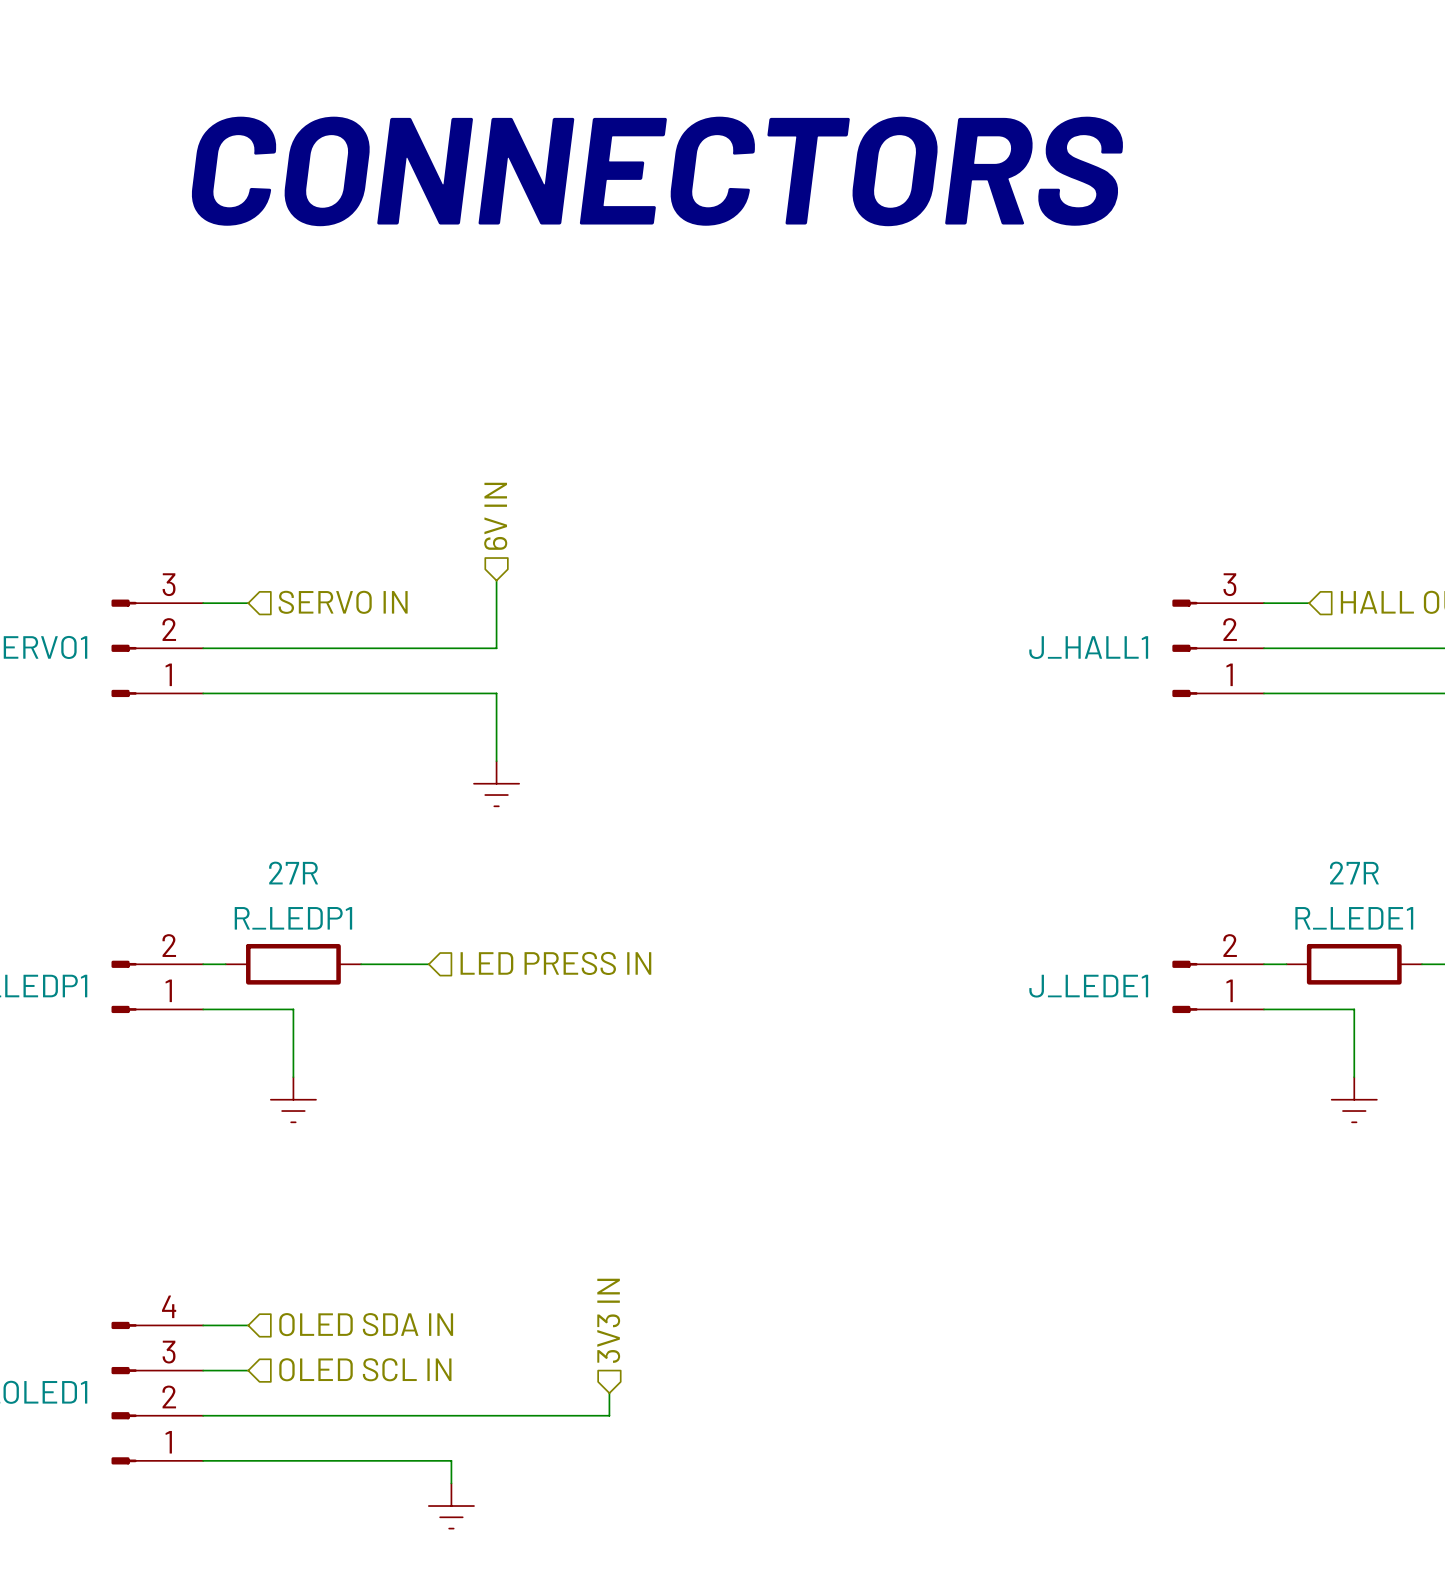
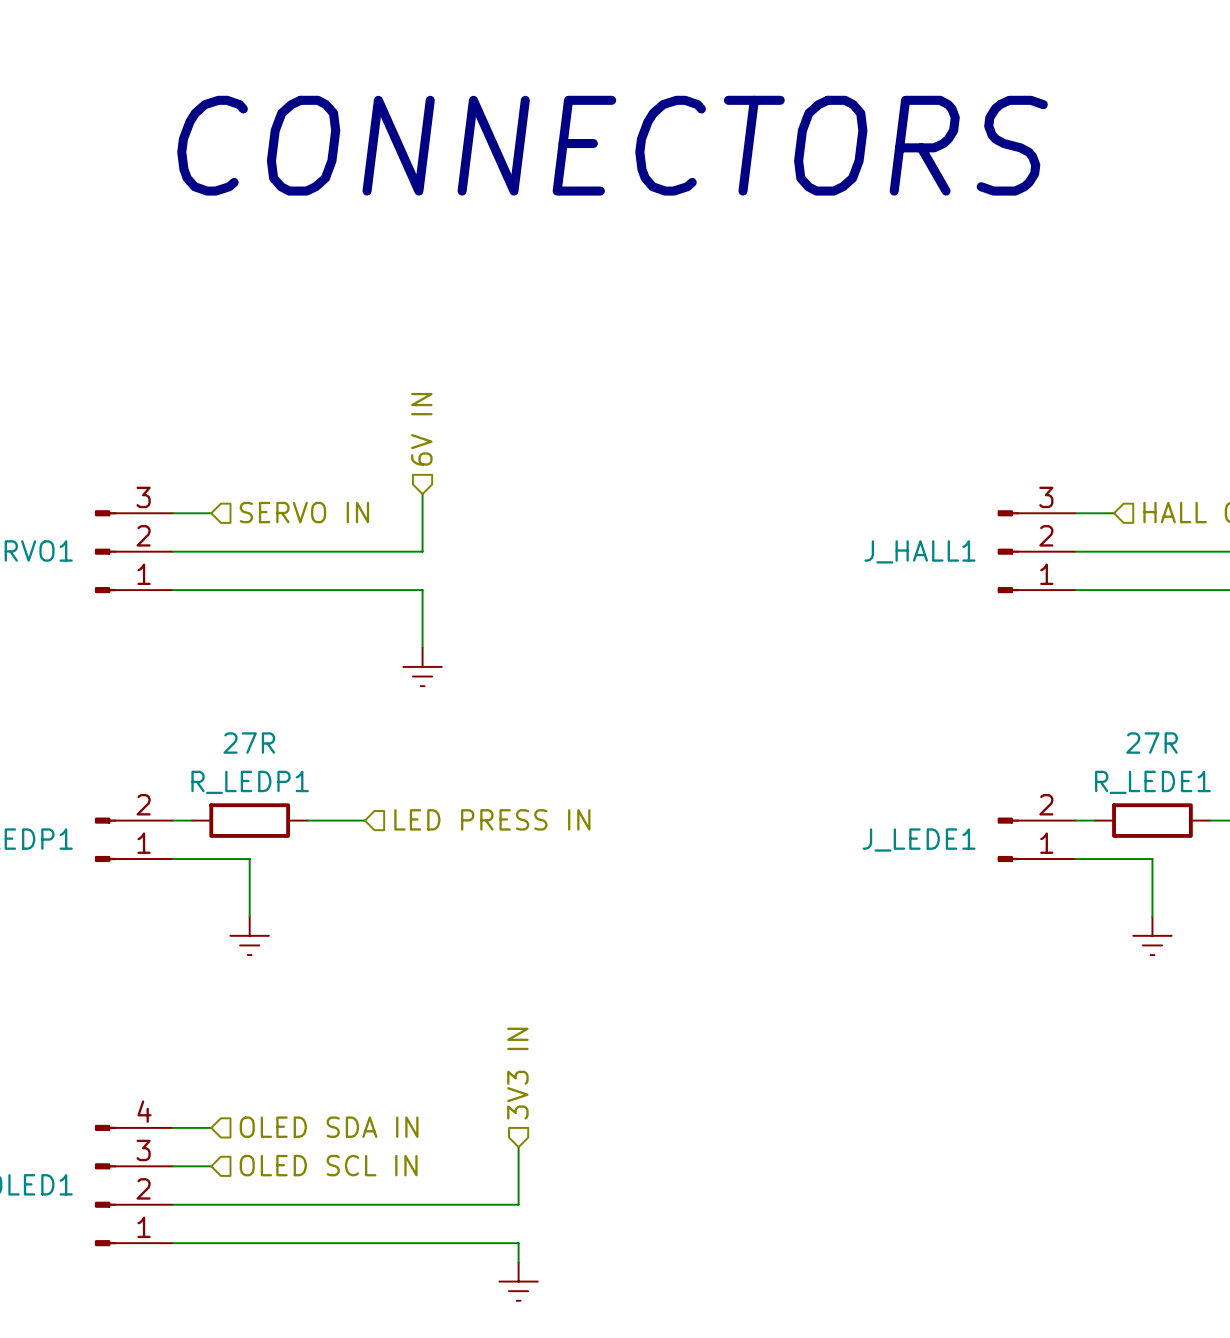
hierarchical label position: 3V3 IN (608, 1320) -> 3V3 IN (517, 1073)
wire: none -> (518, 1147) (518, 1185)
wire: (451, 1460) (451, 1483) -> (384, 1243) (518, 1243) (518, 1262)
power symbol position: (451, 1506) -> (518, 1281)

